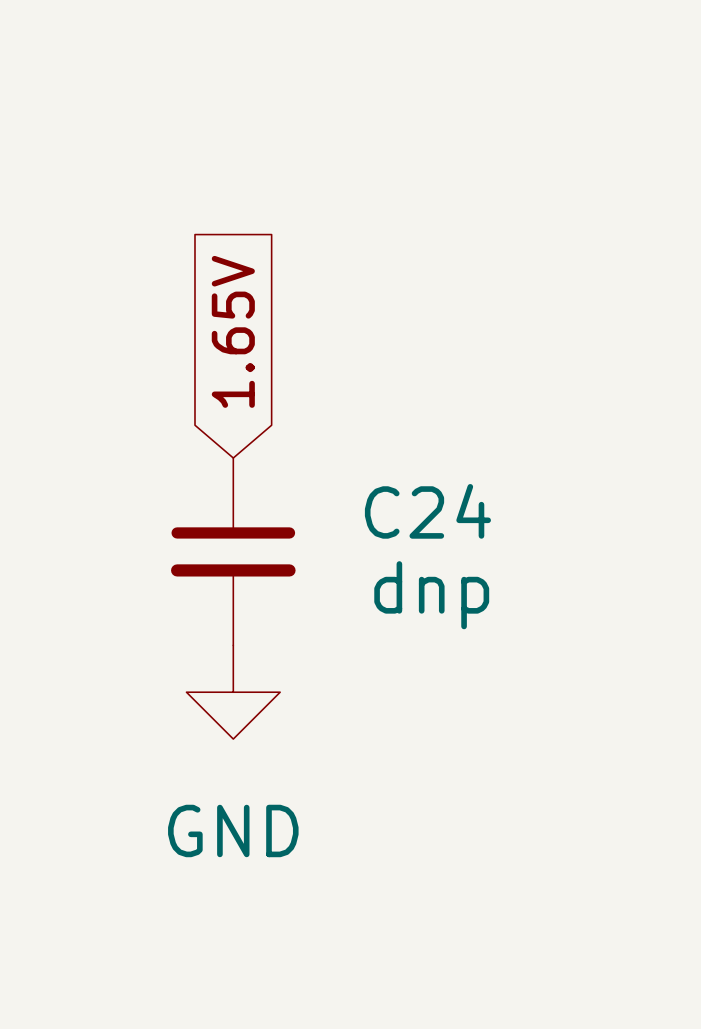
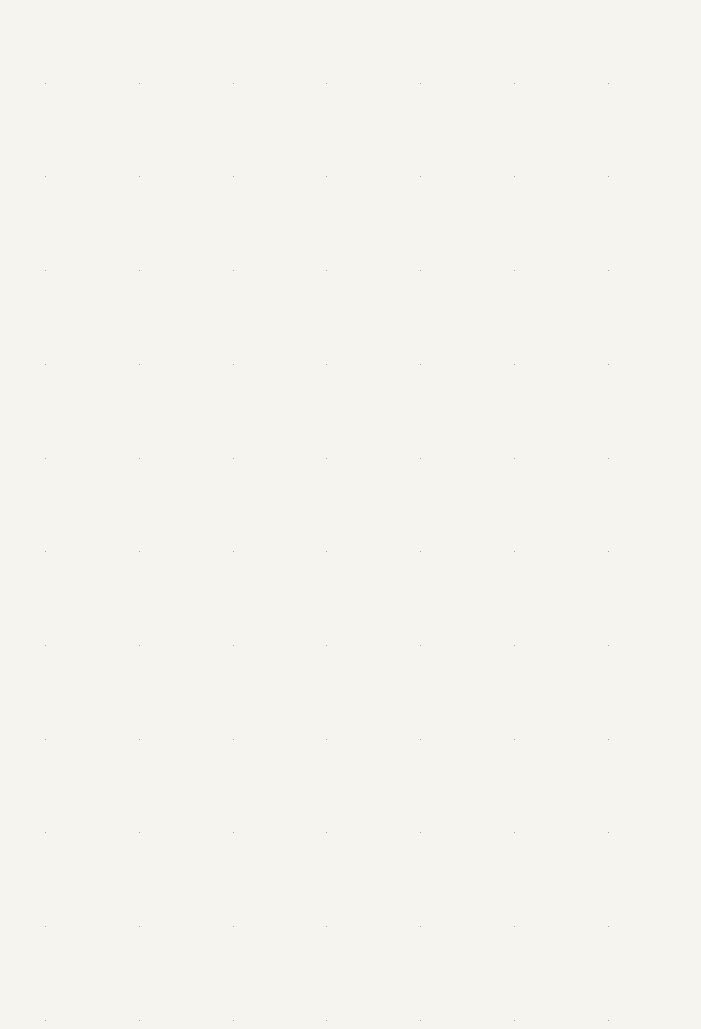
global label: 1.65V (233, 331) -> none
C24: dnp (233, 551) -> none
power symbol: GND (233, 692) -> none

